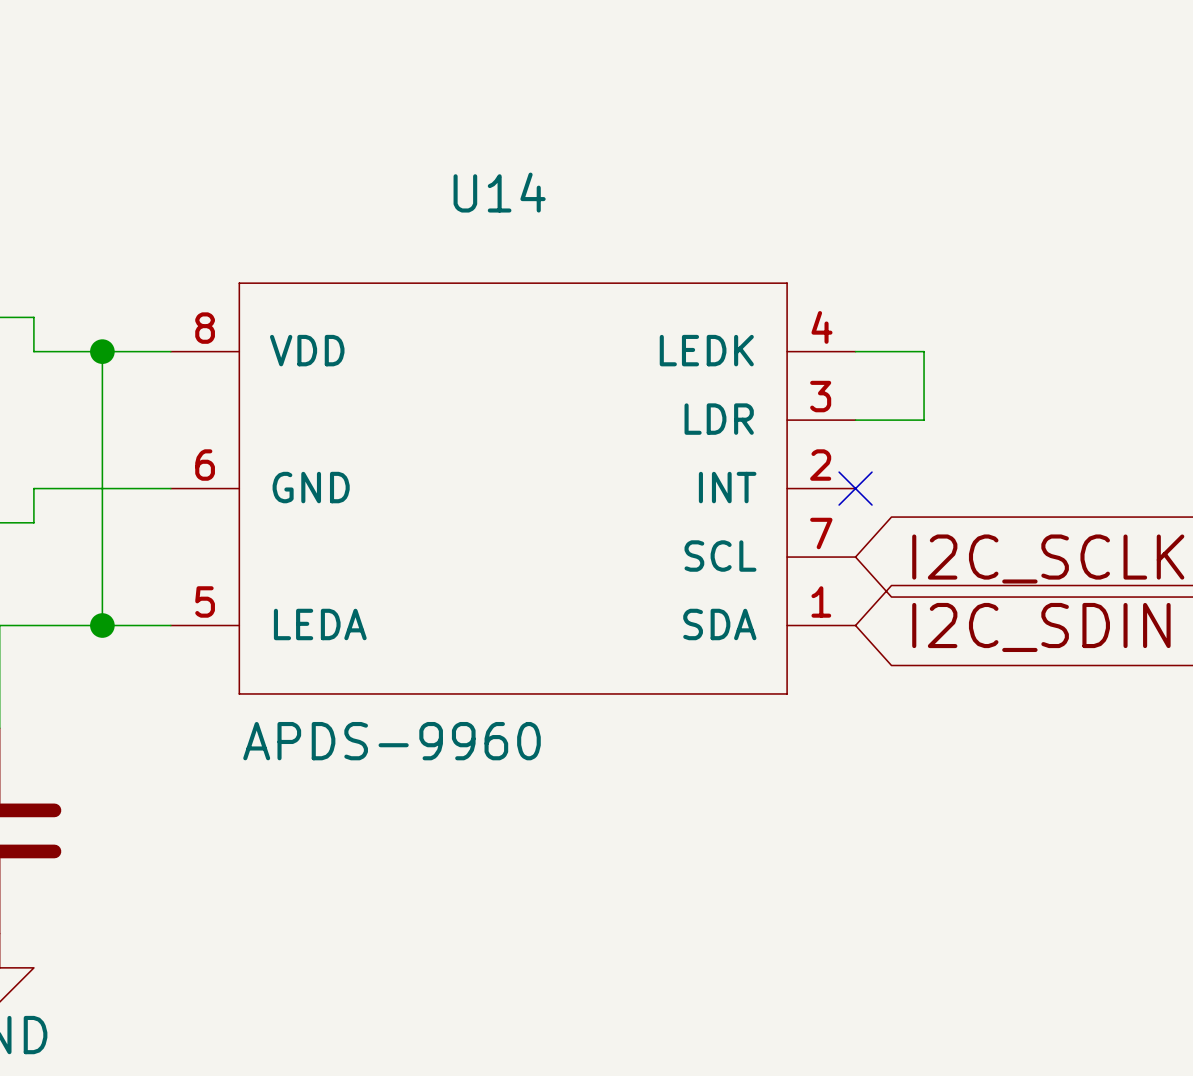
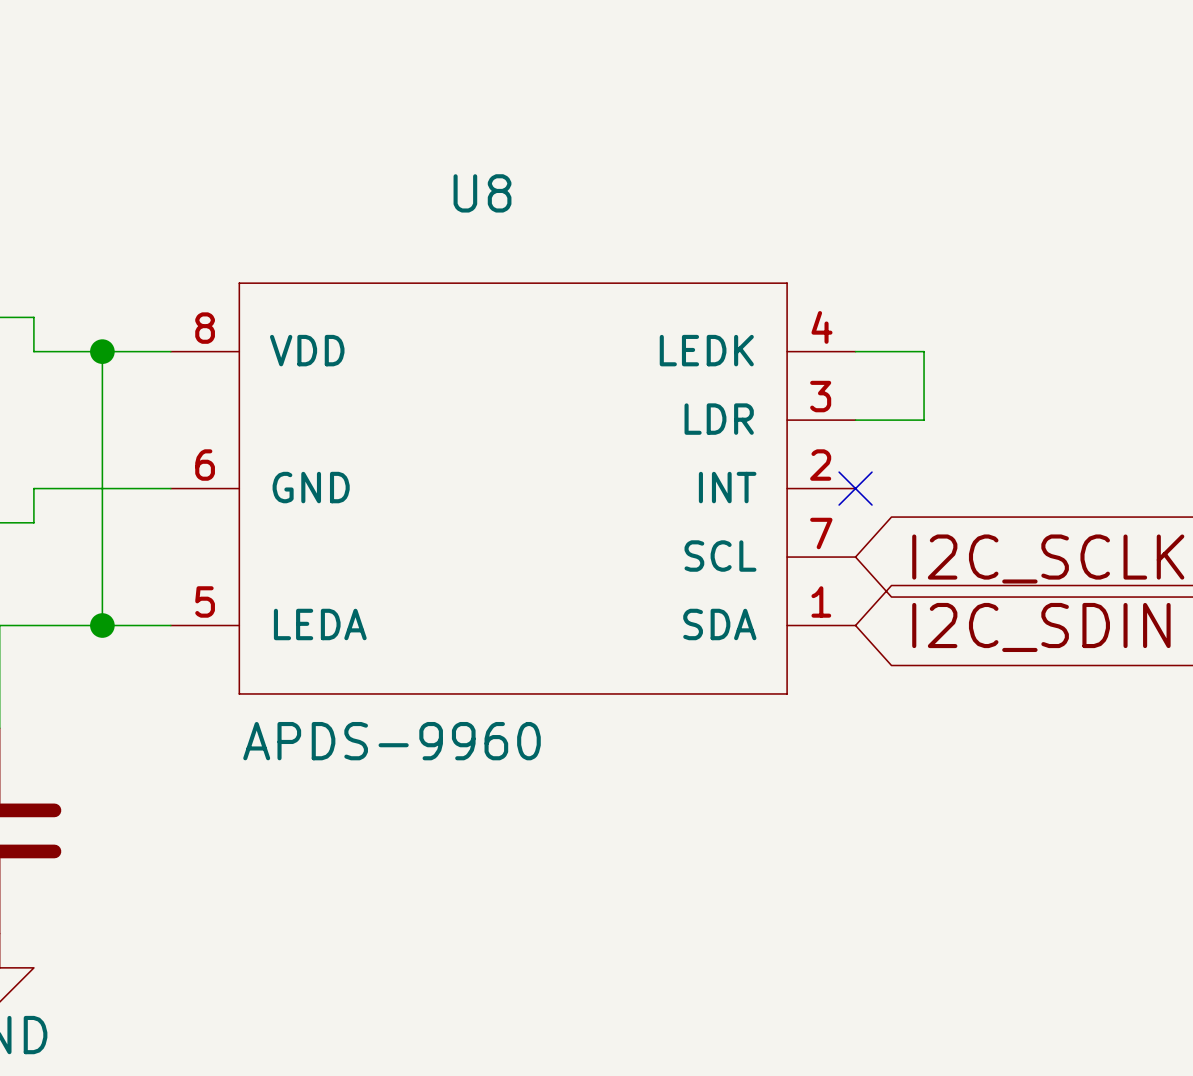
U14 name: U14 (499, 192) -> U8 (482, 193)

